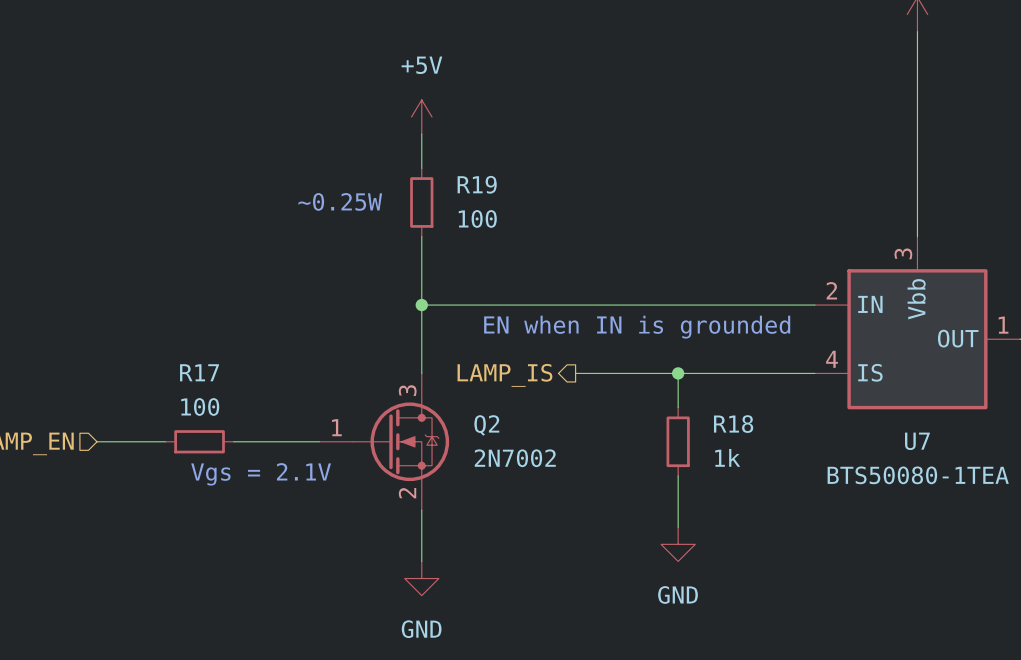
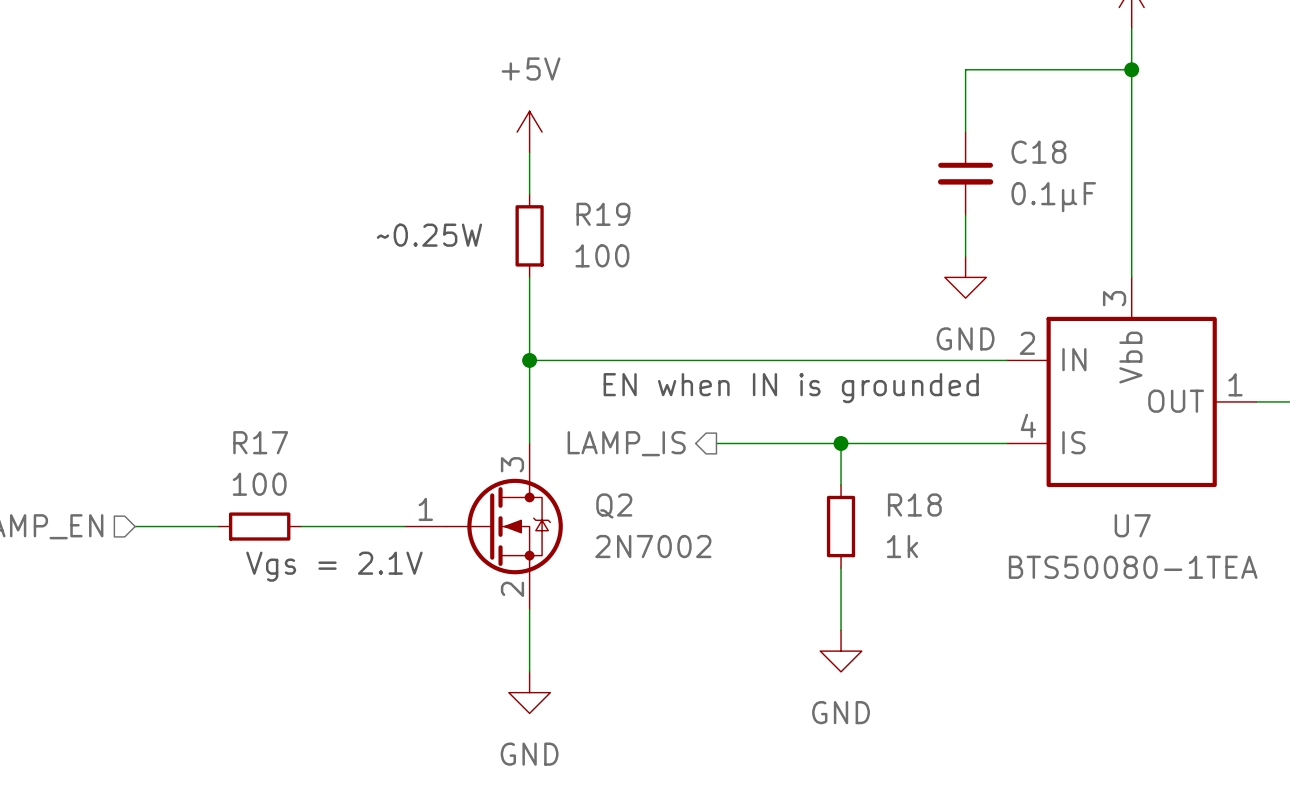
wire: none -> (1131, 69) (965, 69) (965, 132)
junction: none -> (1131, 69)
C18: none -> 0.1µF (965, 173)
wire: none -> (965, 215) (965, 256)
power symbol: none -> GND (965, 277)

